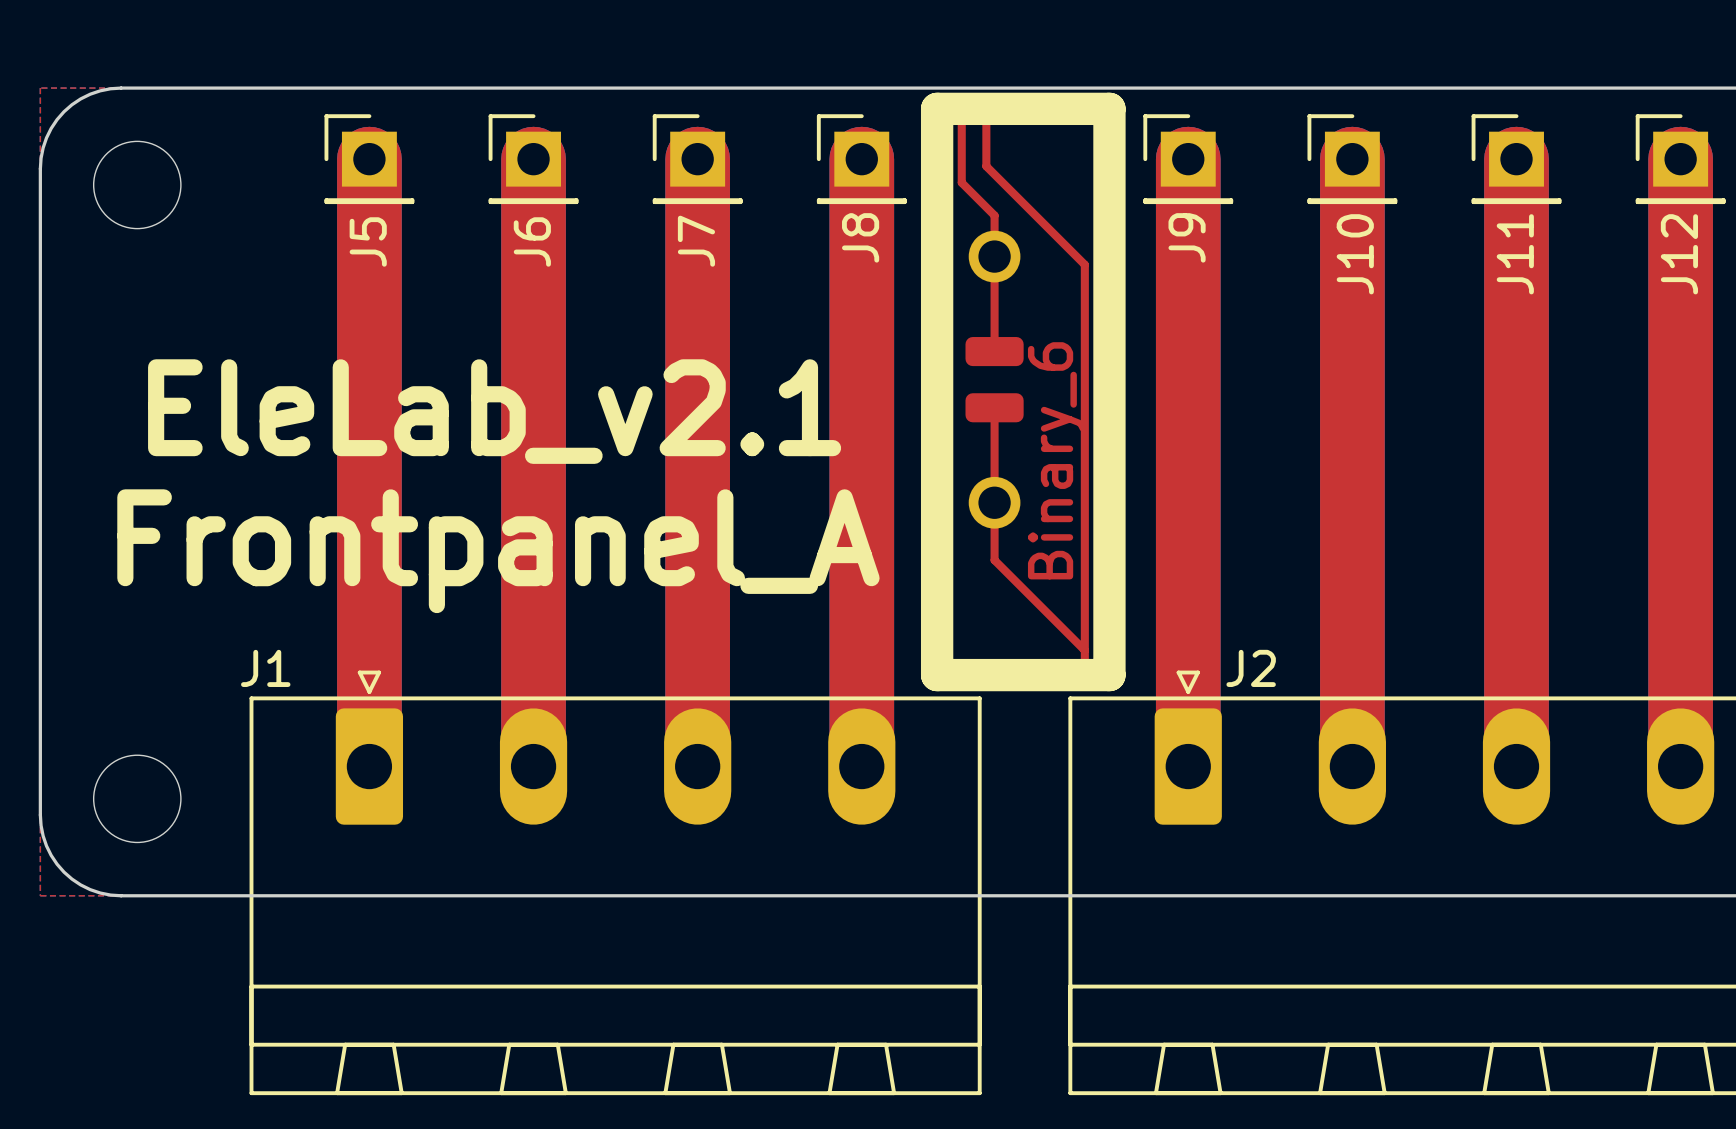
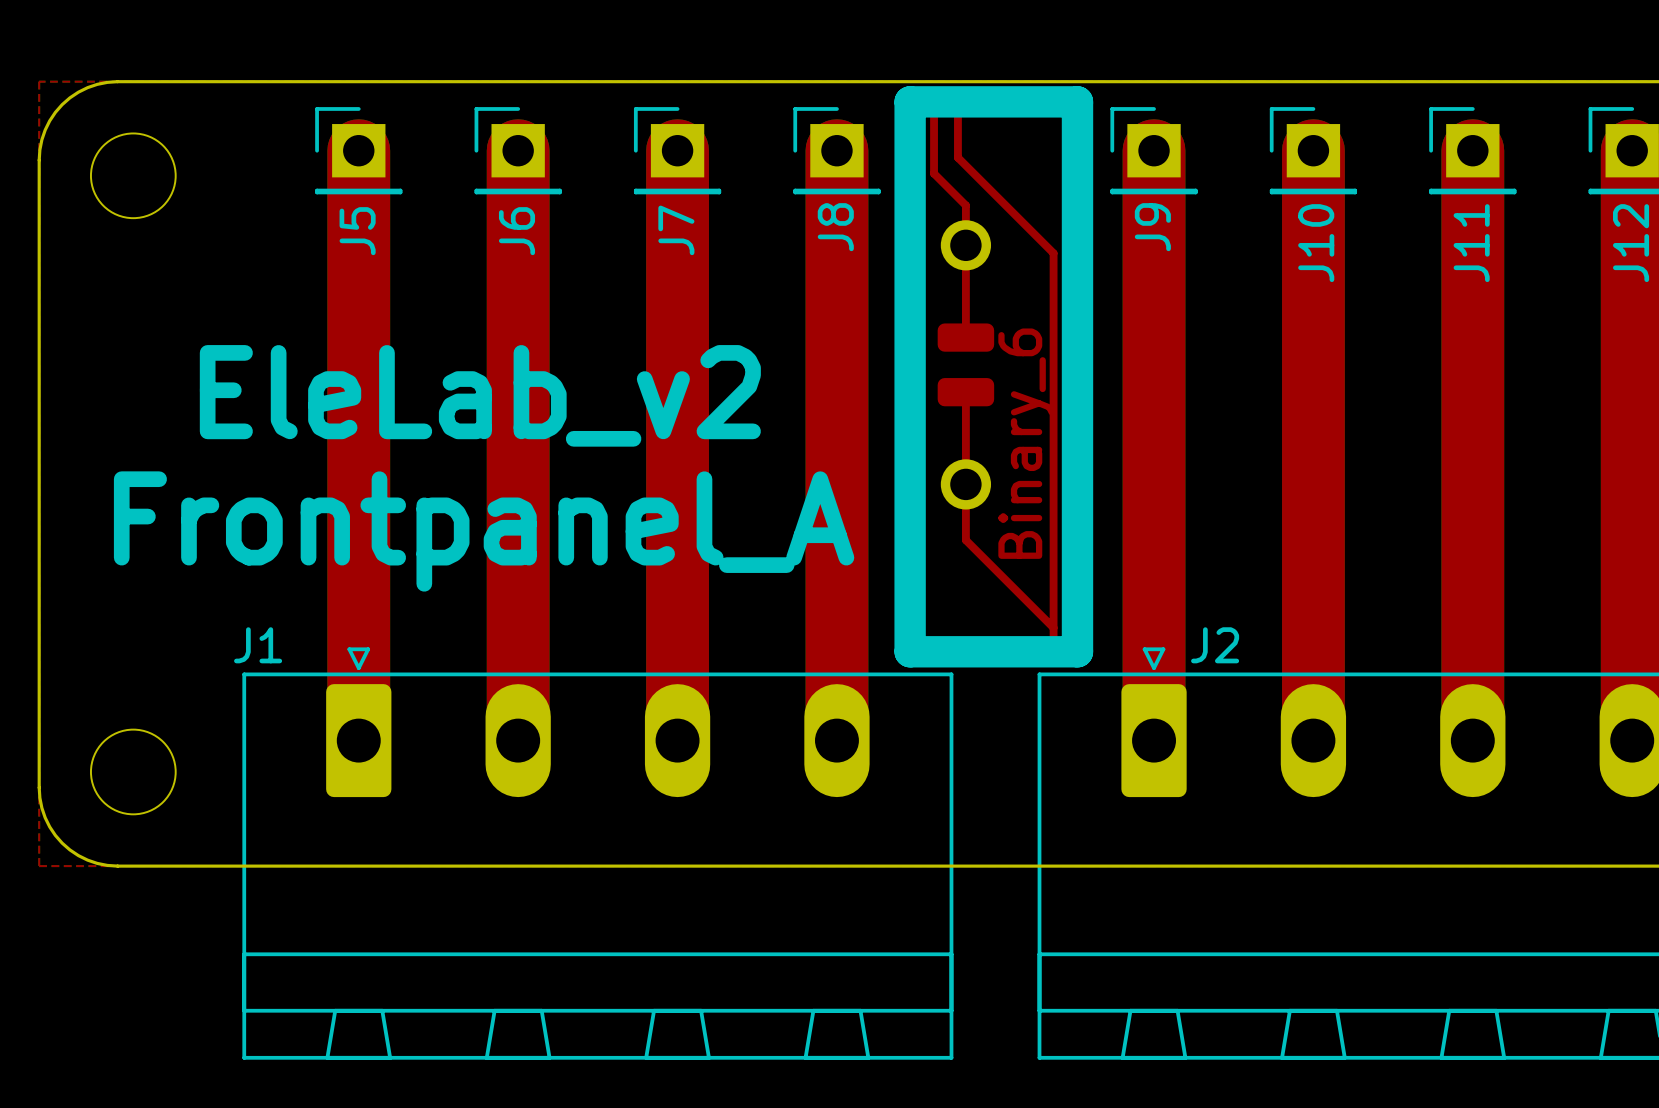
text: EleLab_v2.1 (494, 411) -> EleLab_v2 (480, 395)

